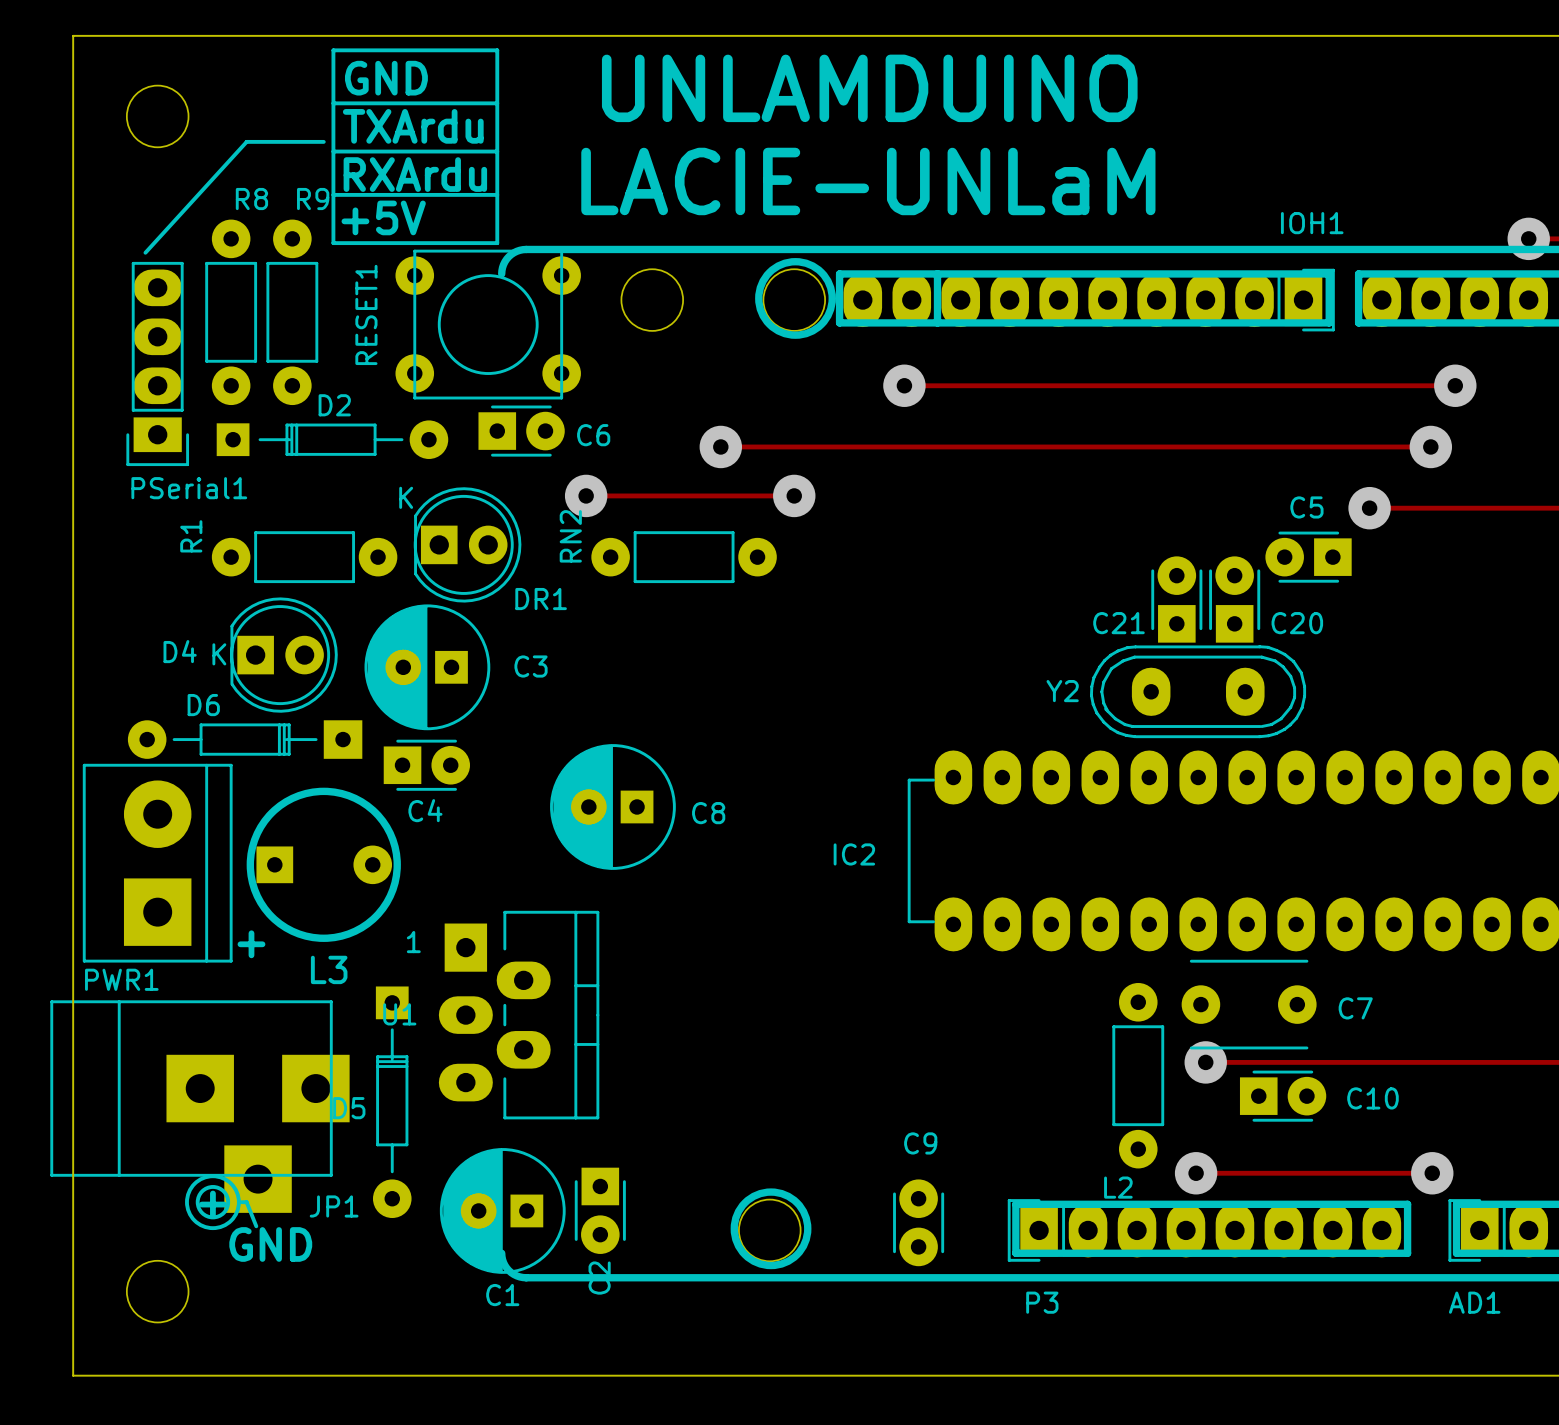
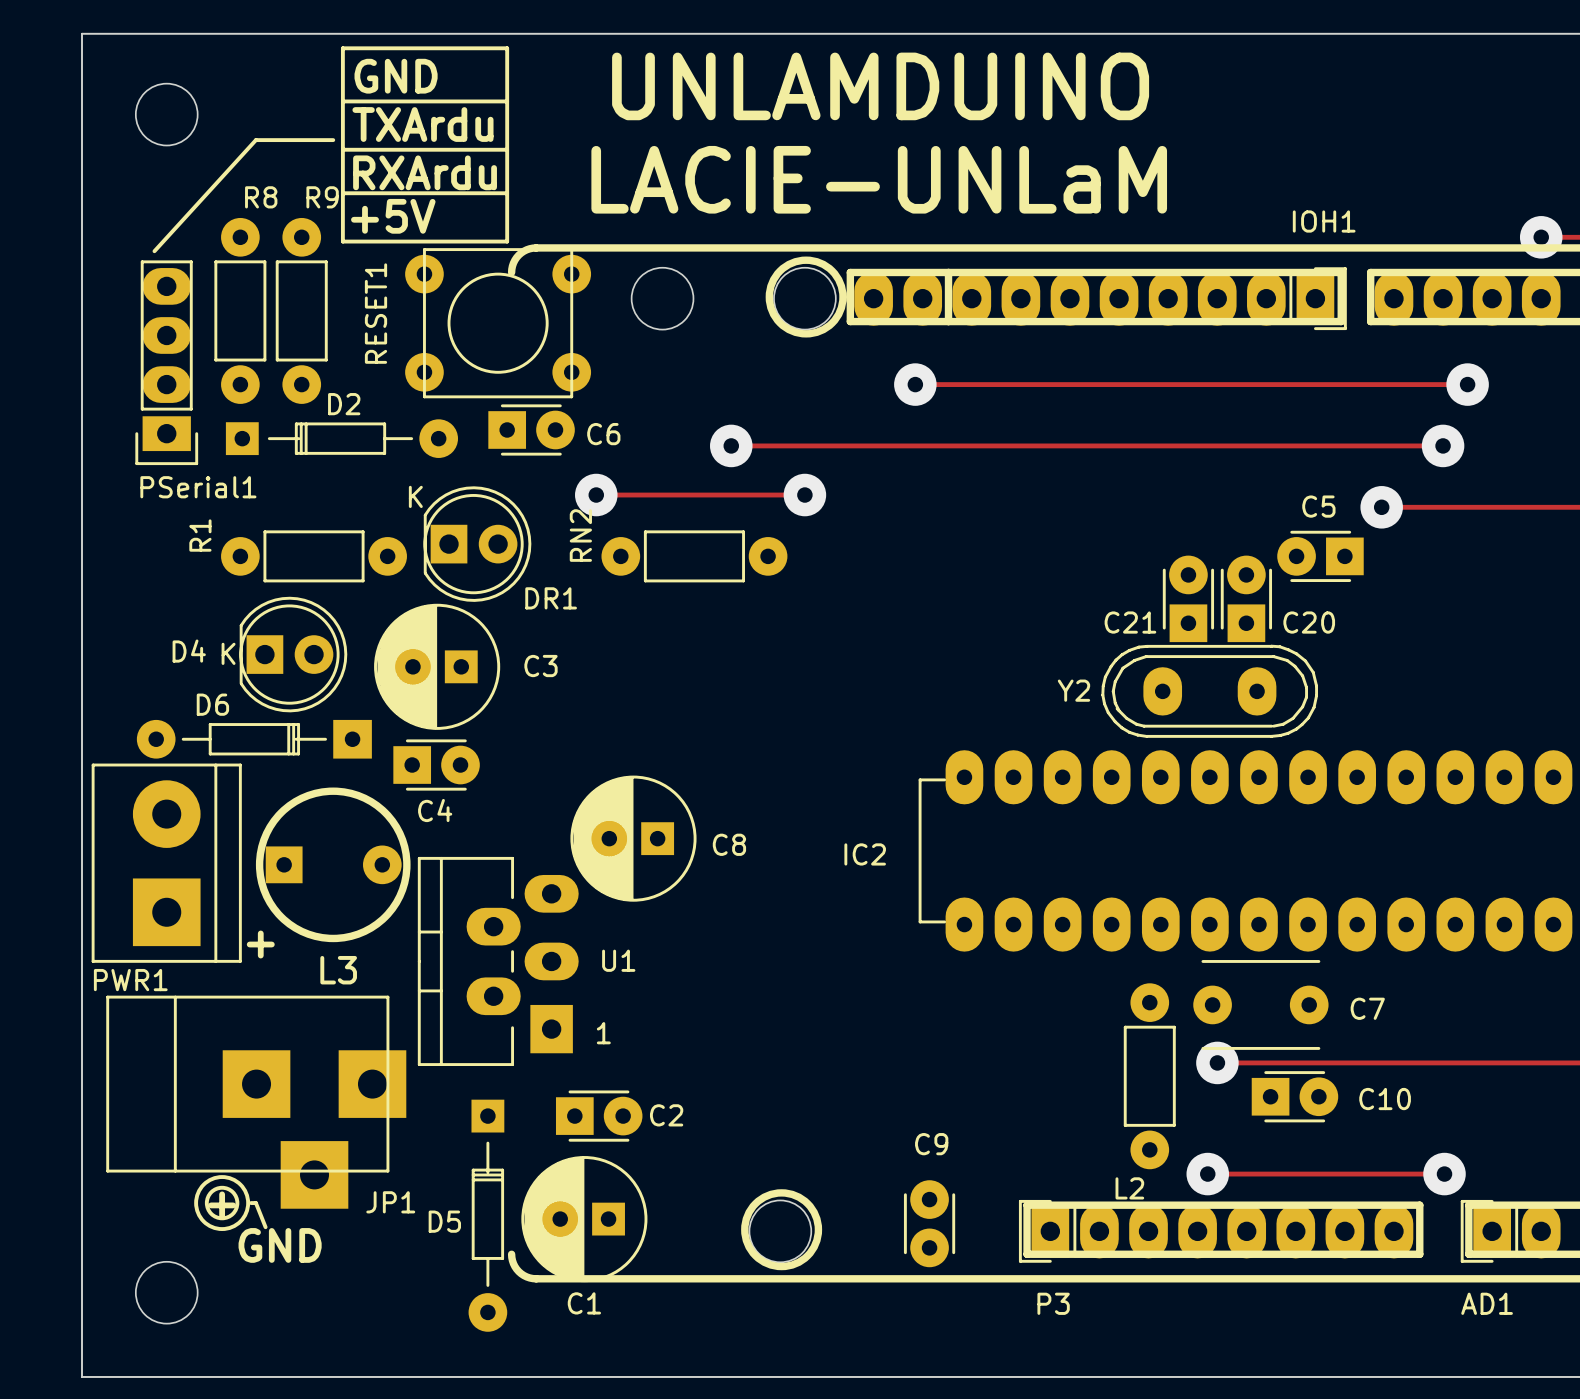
C8 position: (612, 806) -> (633, 838)
U1 rotation: 0° (519, 1015) -> 180° (498, 961)
D5 position: (392, 1102) -> (487, 1215)
JP1 position: (199, 1106) -> (256, 1102)
C1 position: (502, 1210) -> (584, 1219)
C2 rotation: 0° (600, 1210) -> 90° counterclockwise (599, 1116)
C2 position: (600, 1210) -> (599, 1116)

